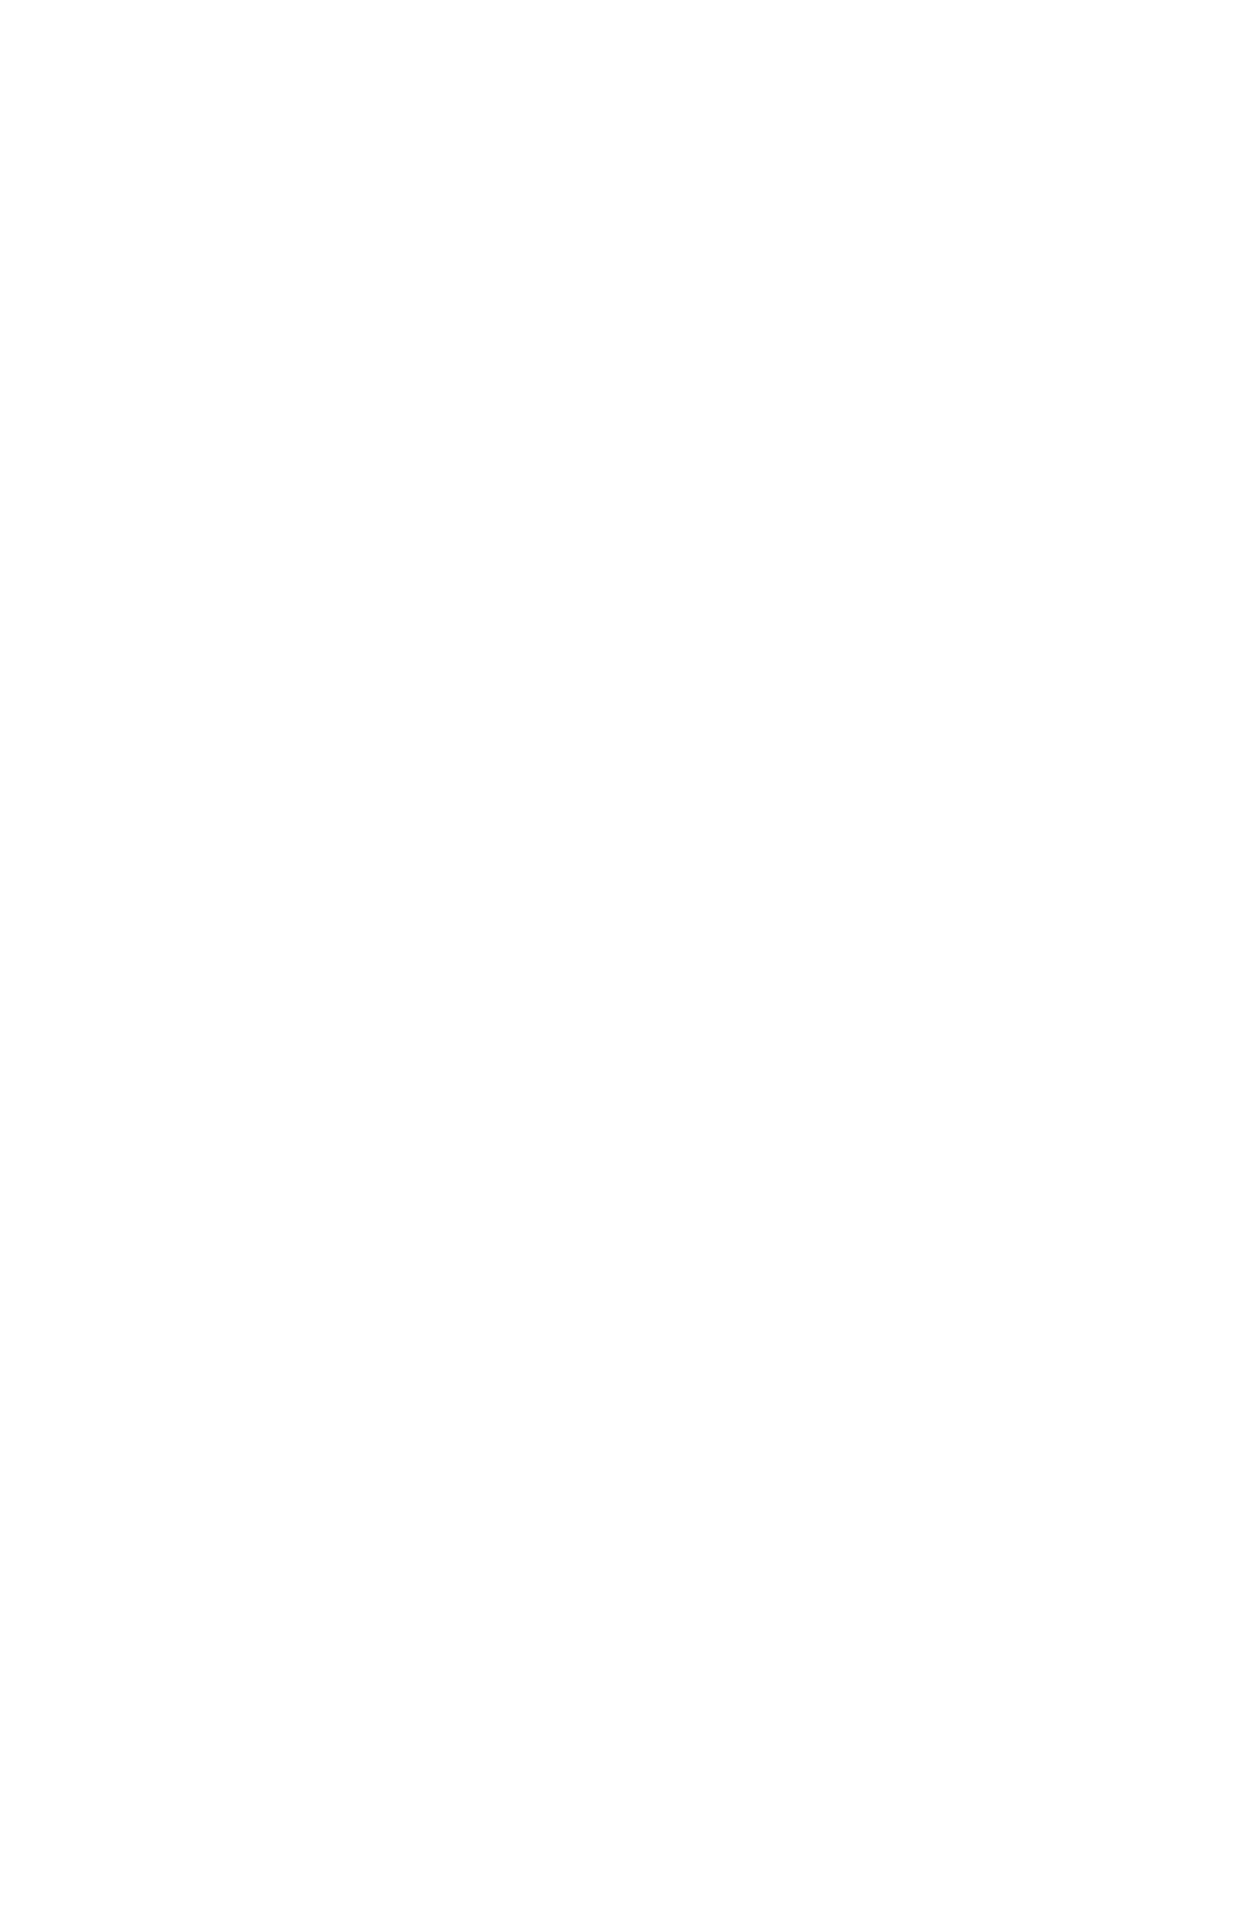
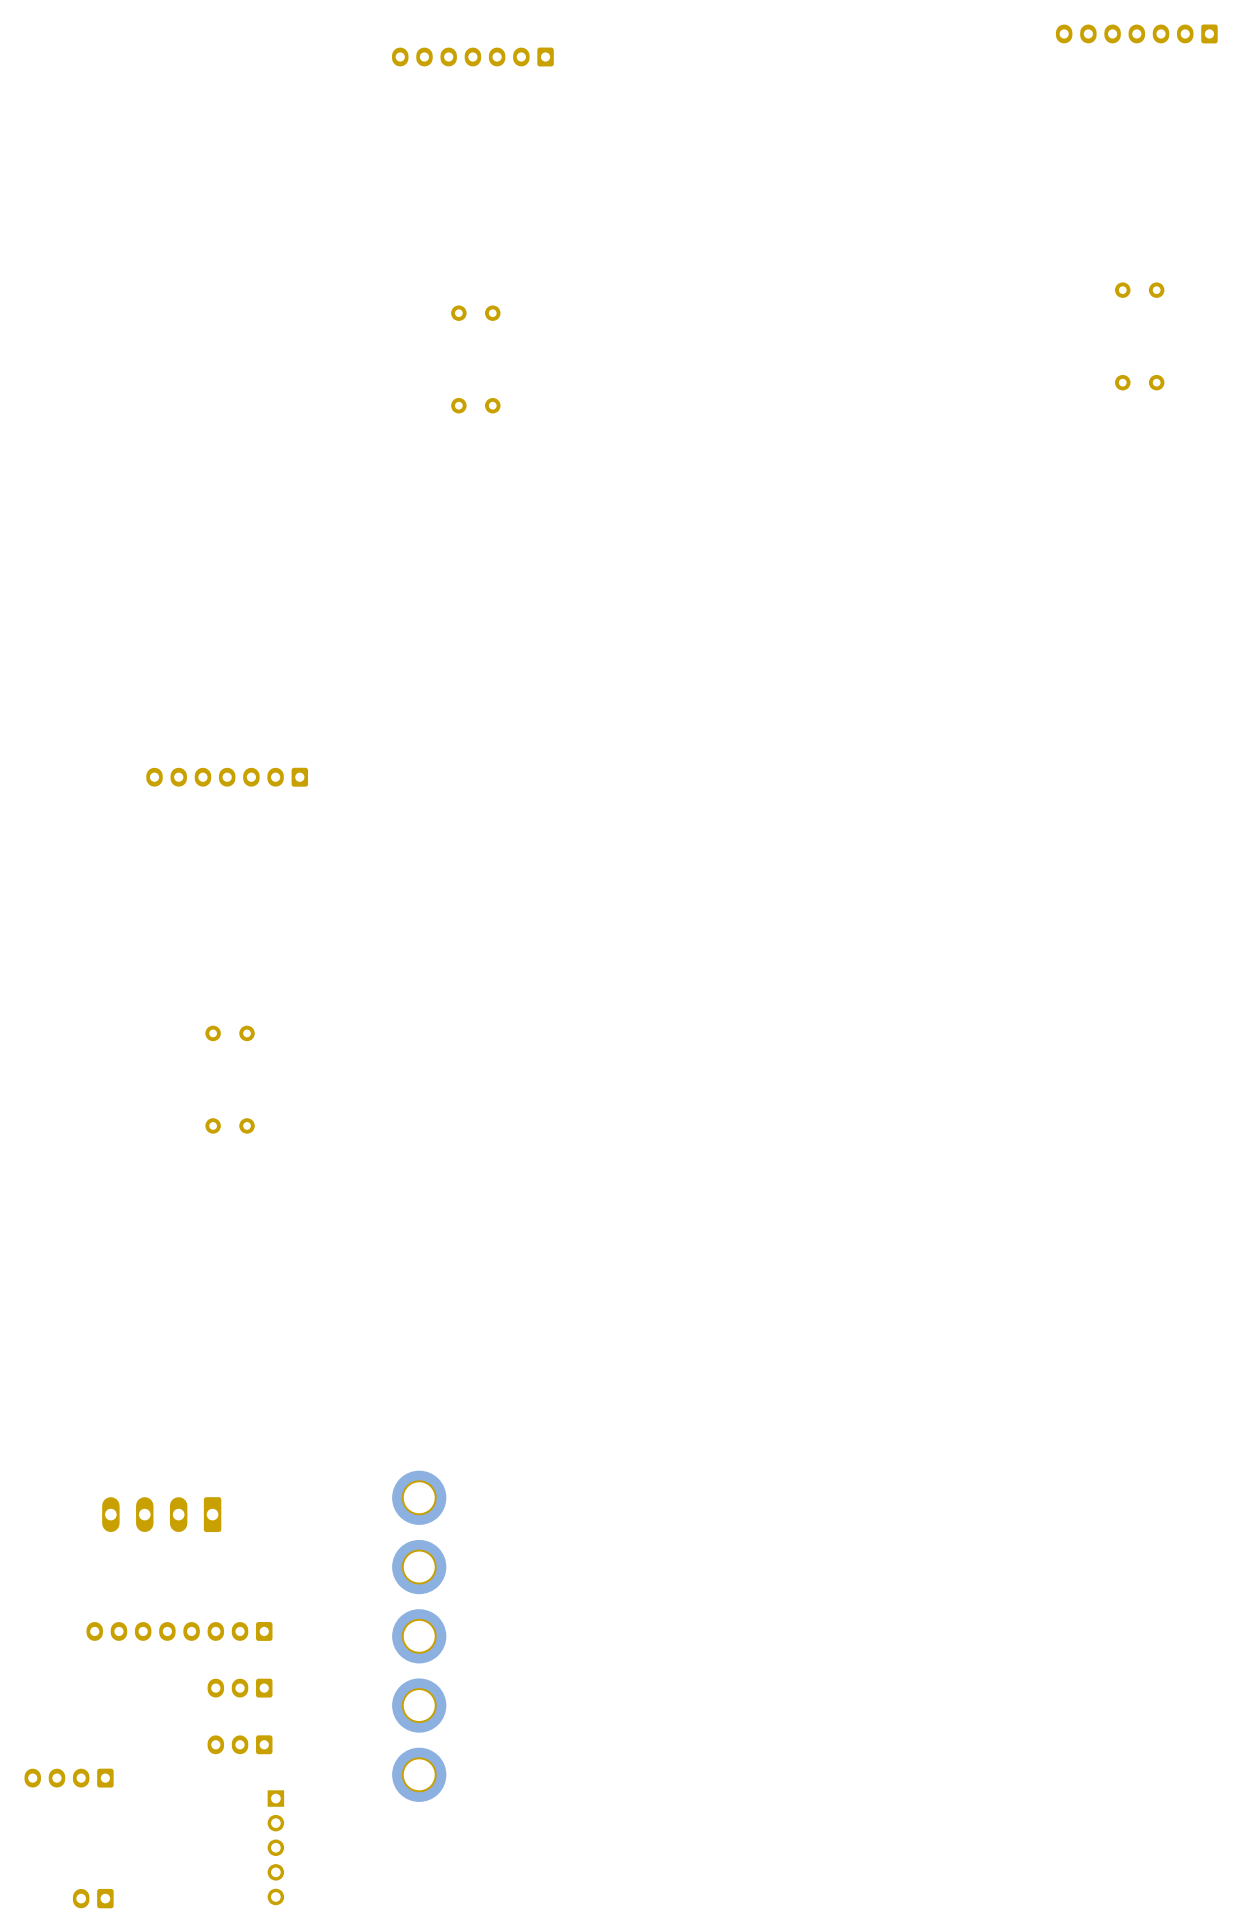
part: none -> (1136, 33)
part: none -> (472, 57)
part: none -> (1139, 290)
part: none -> (475, 313)
part: none -> (1139, 382)
part: none -> (475, 405)
part: none -> (227, 777)
part: none -> (230, 1033)
part: none -> (230, 1125)
part: none -> (419, 1497)
part: none -> (161, 1514)
part: none -> (419, 1567)
part: none -> (179, 1631)
part: none -> (419, 1636)
part: none -> (240, 1688)
part: none -> (419, 1705)
part: none -> (240, 1744)
part: none -> (419, 1774)
part: none -> (69, 1778)
part: none -> (275, 1847)
part: none -> (93, 1898)

